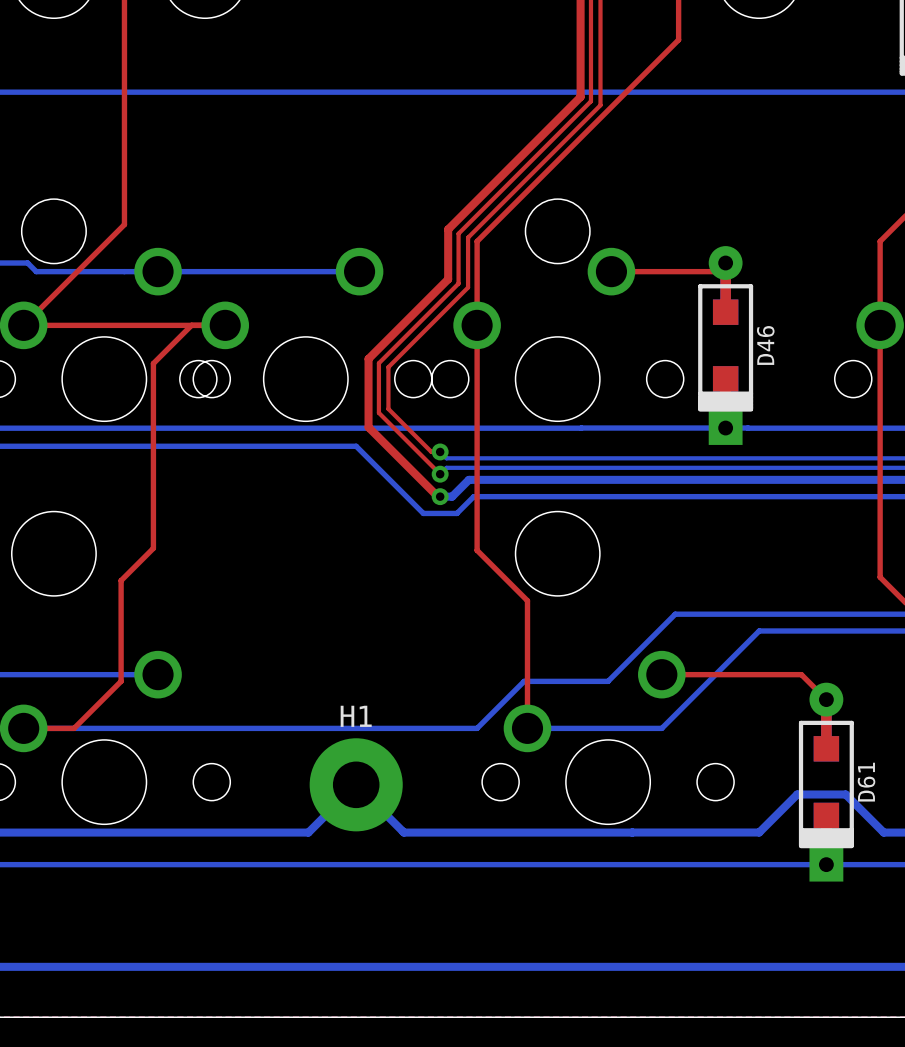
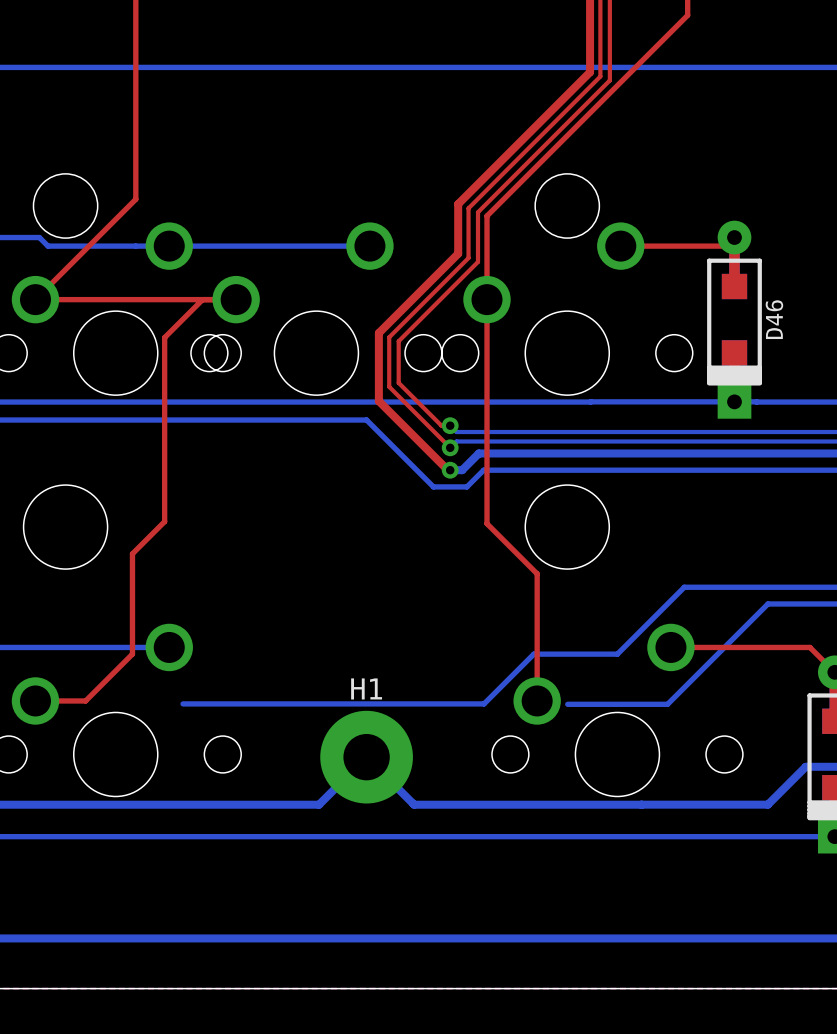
bottom track: (23, 728) (477, 728) -> (183, 703) (484, 703) (487, 700)
bottom track: (527, 728) (661, 728) -> (567, 704) (667, 704) (670, 700)

